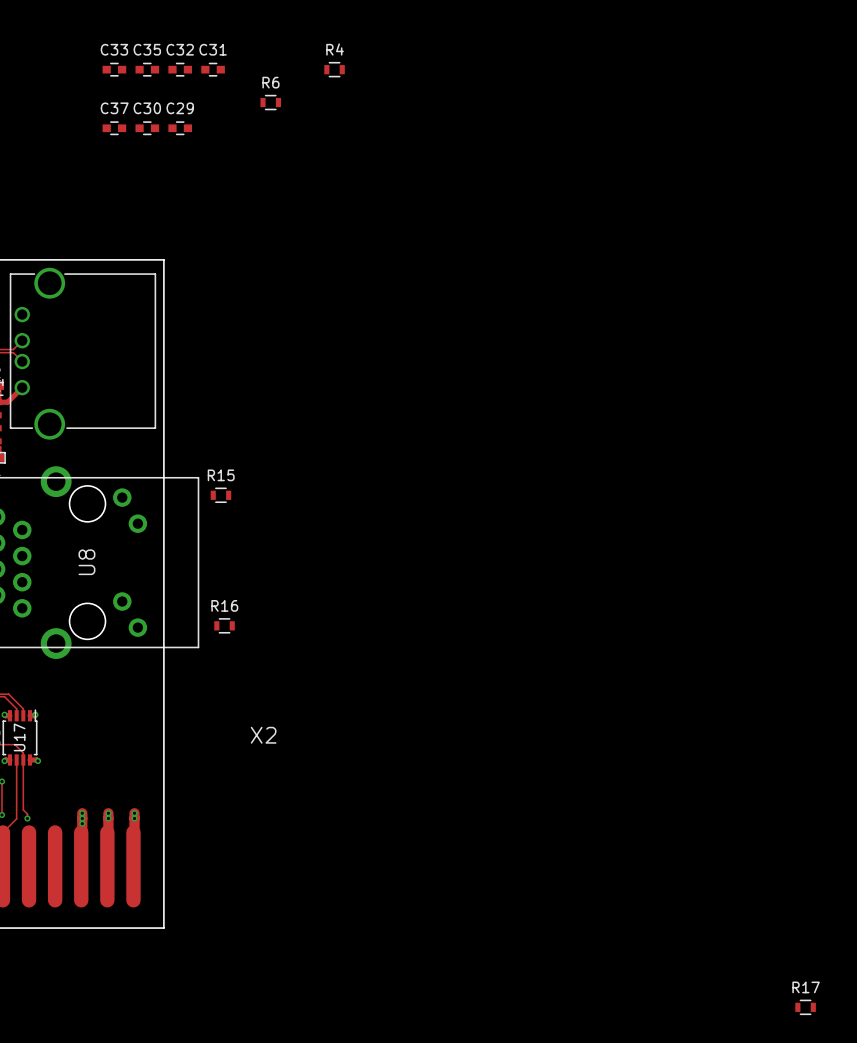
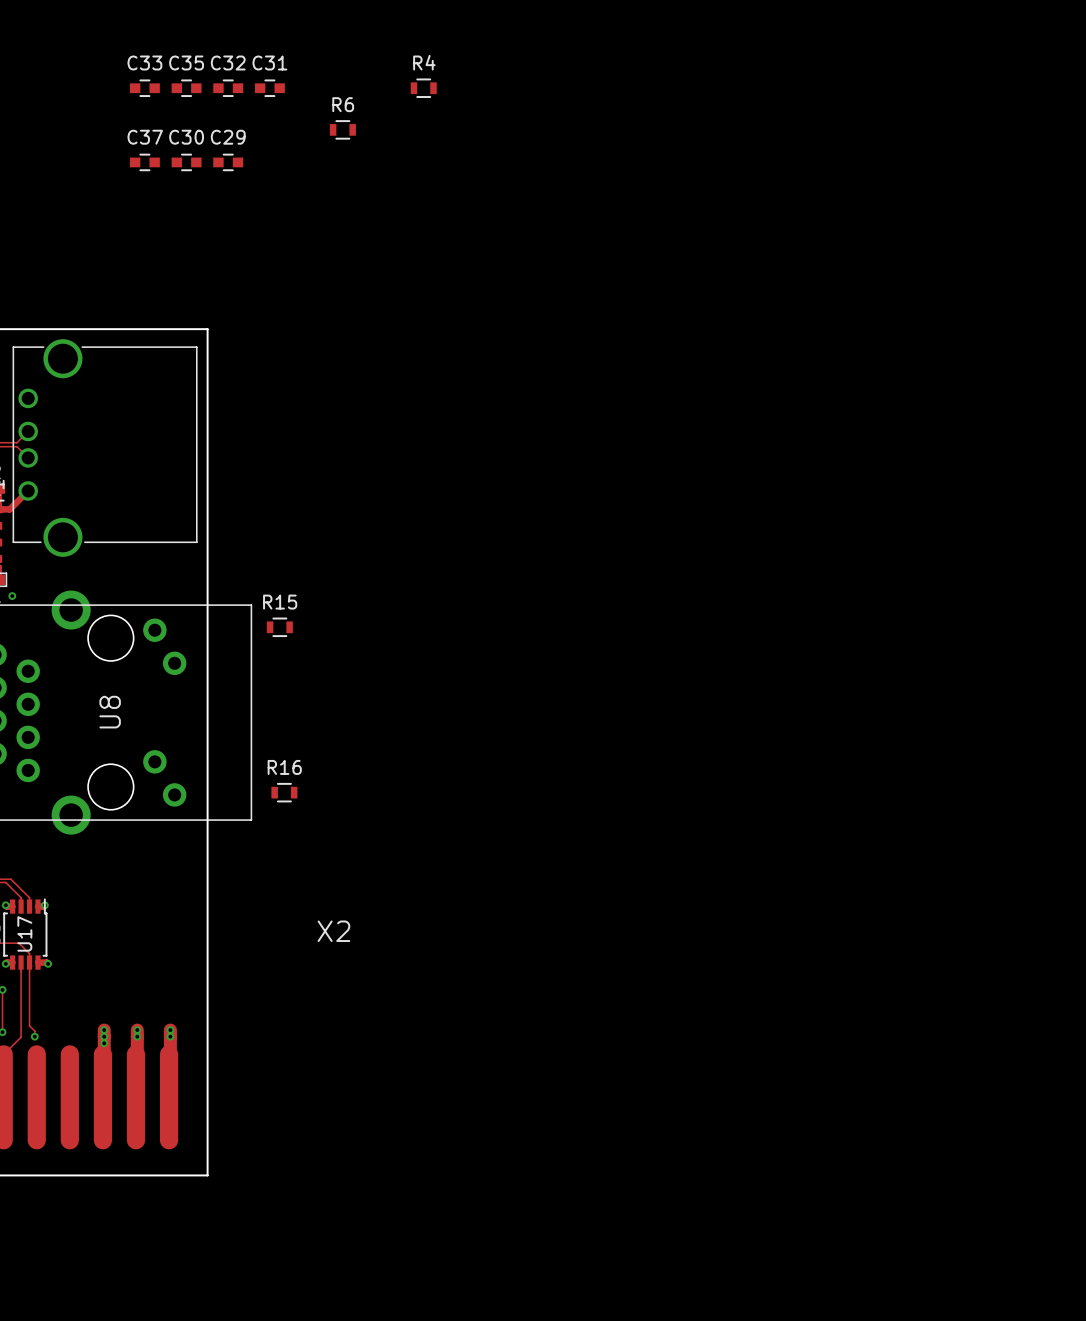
via: none -> (12, 596)
R17: (805, 1007) -> none

